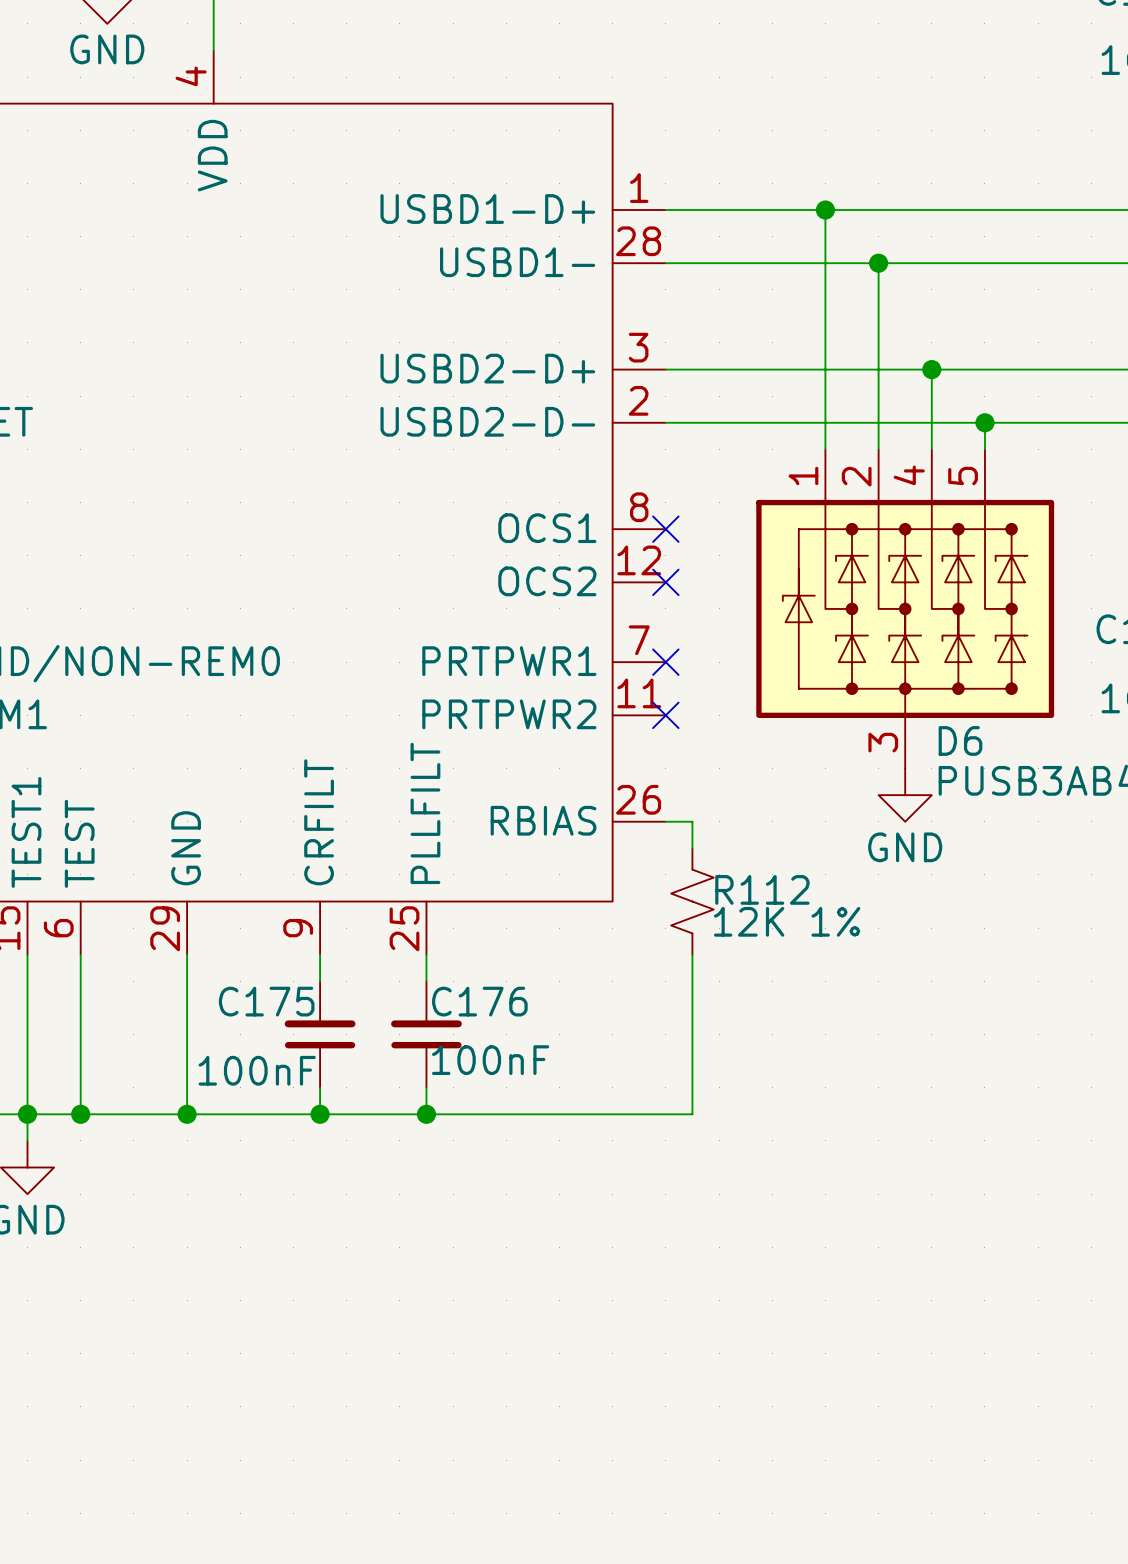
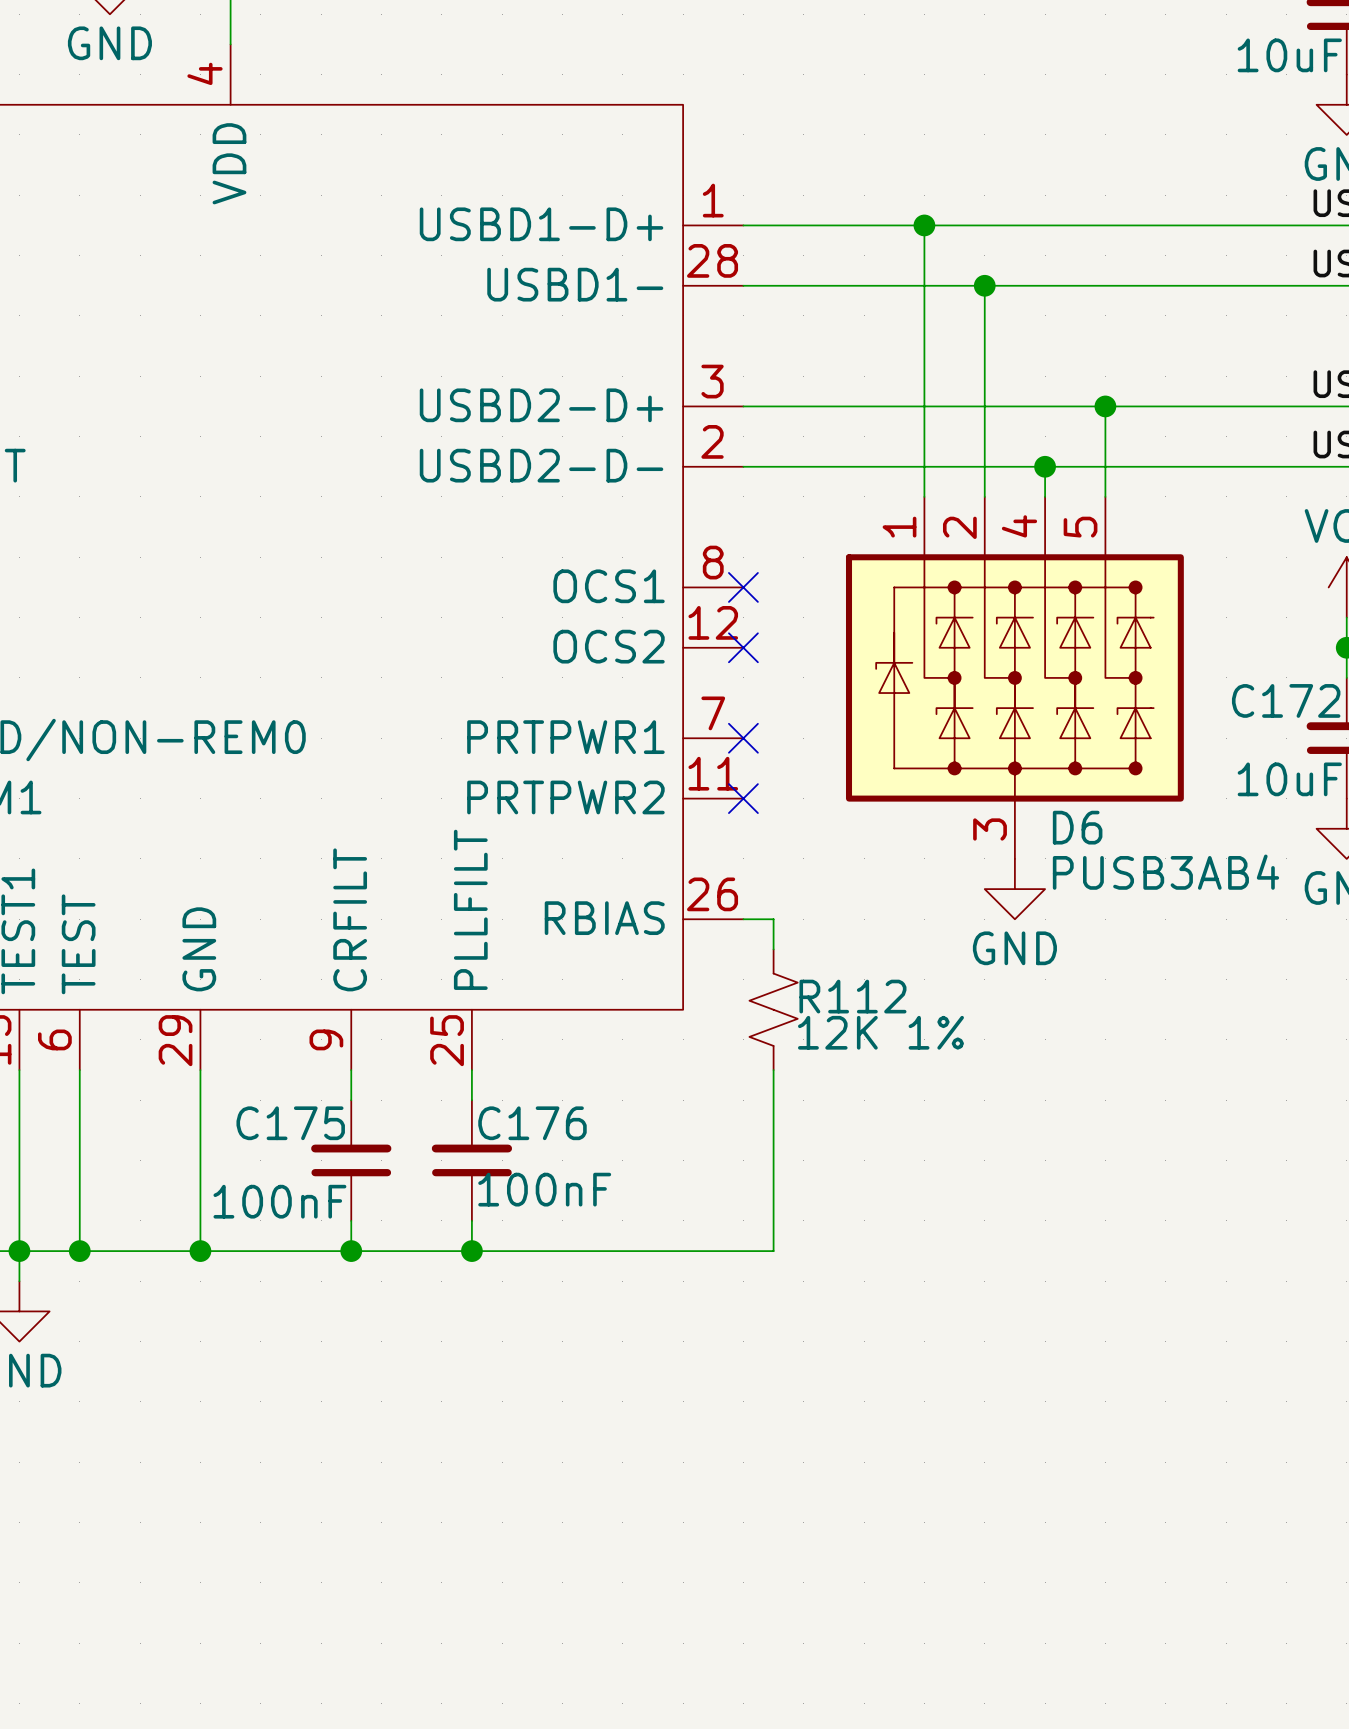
wire: (931, 369) (931, 422) -> (1105, 406) (1105, 466)
junction: (931, 369) -> none
junction: none -> (1105, 406)
junction: none -> (1045, 466)
junction: (984, 422) -> none

